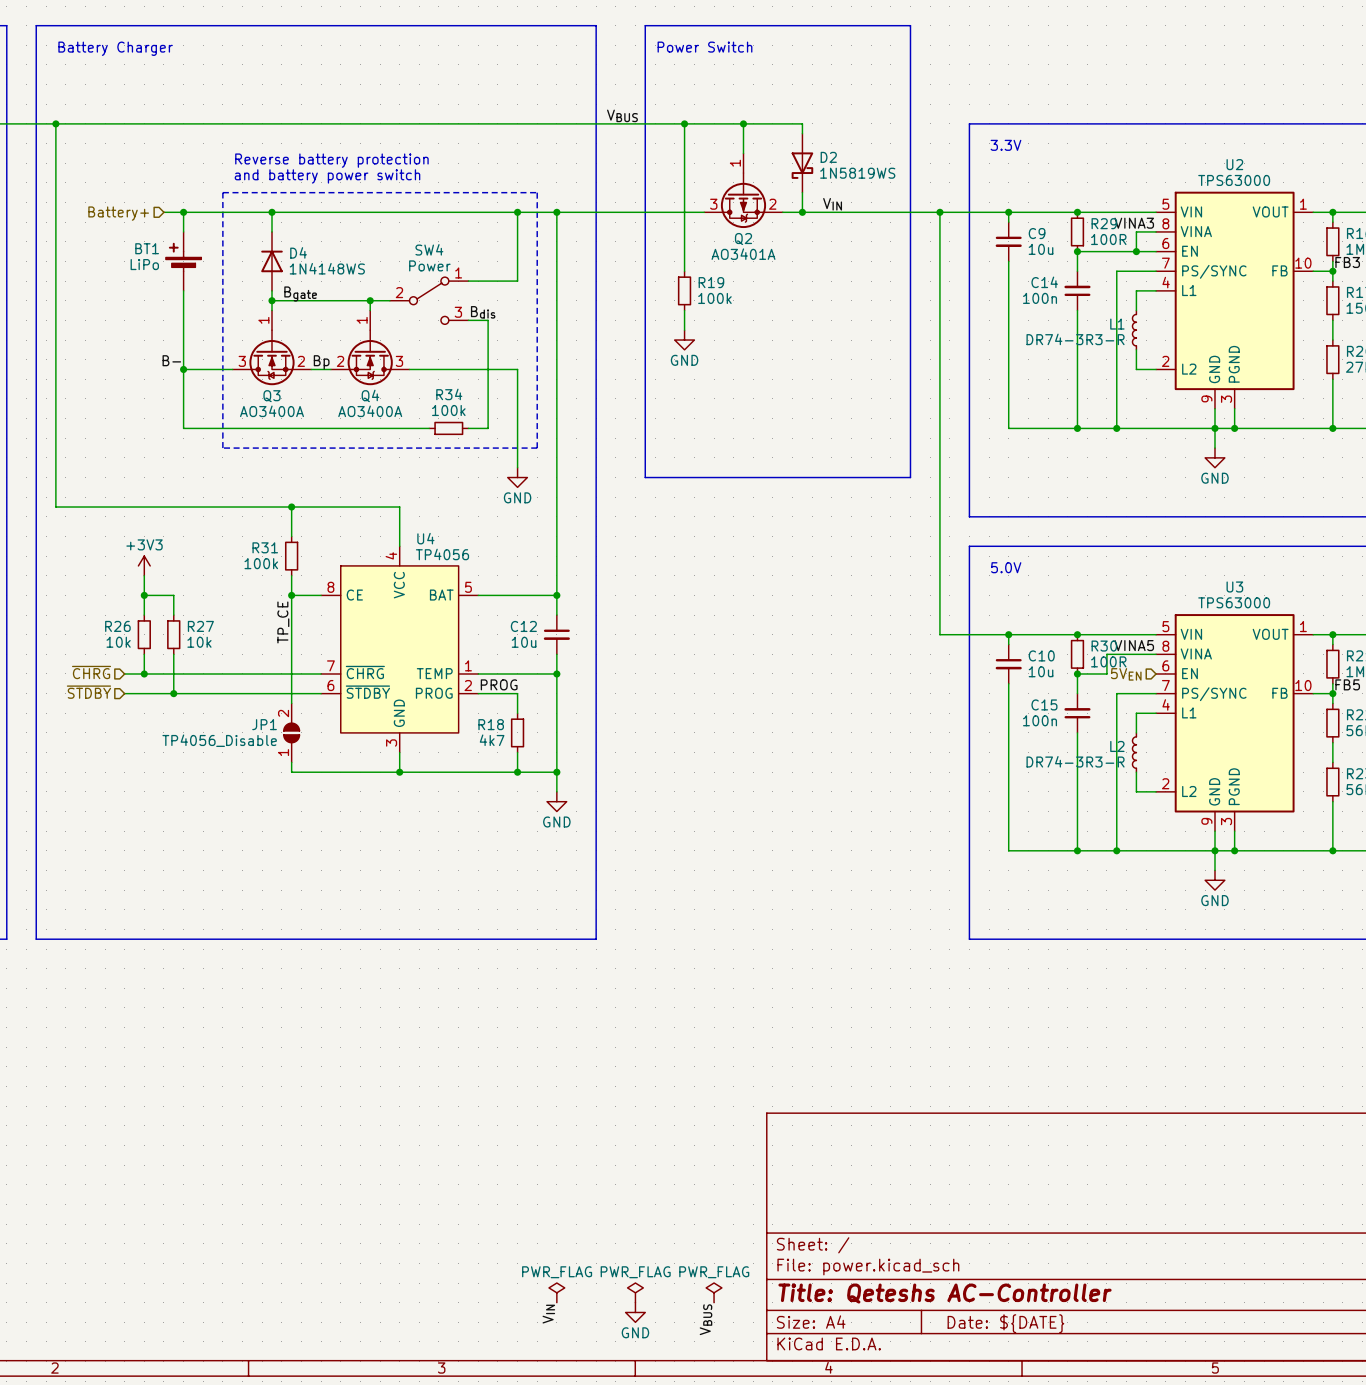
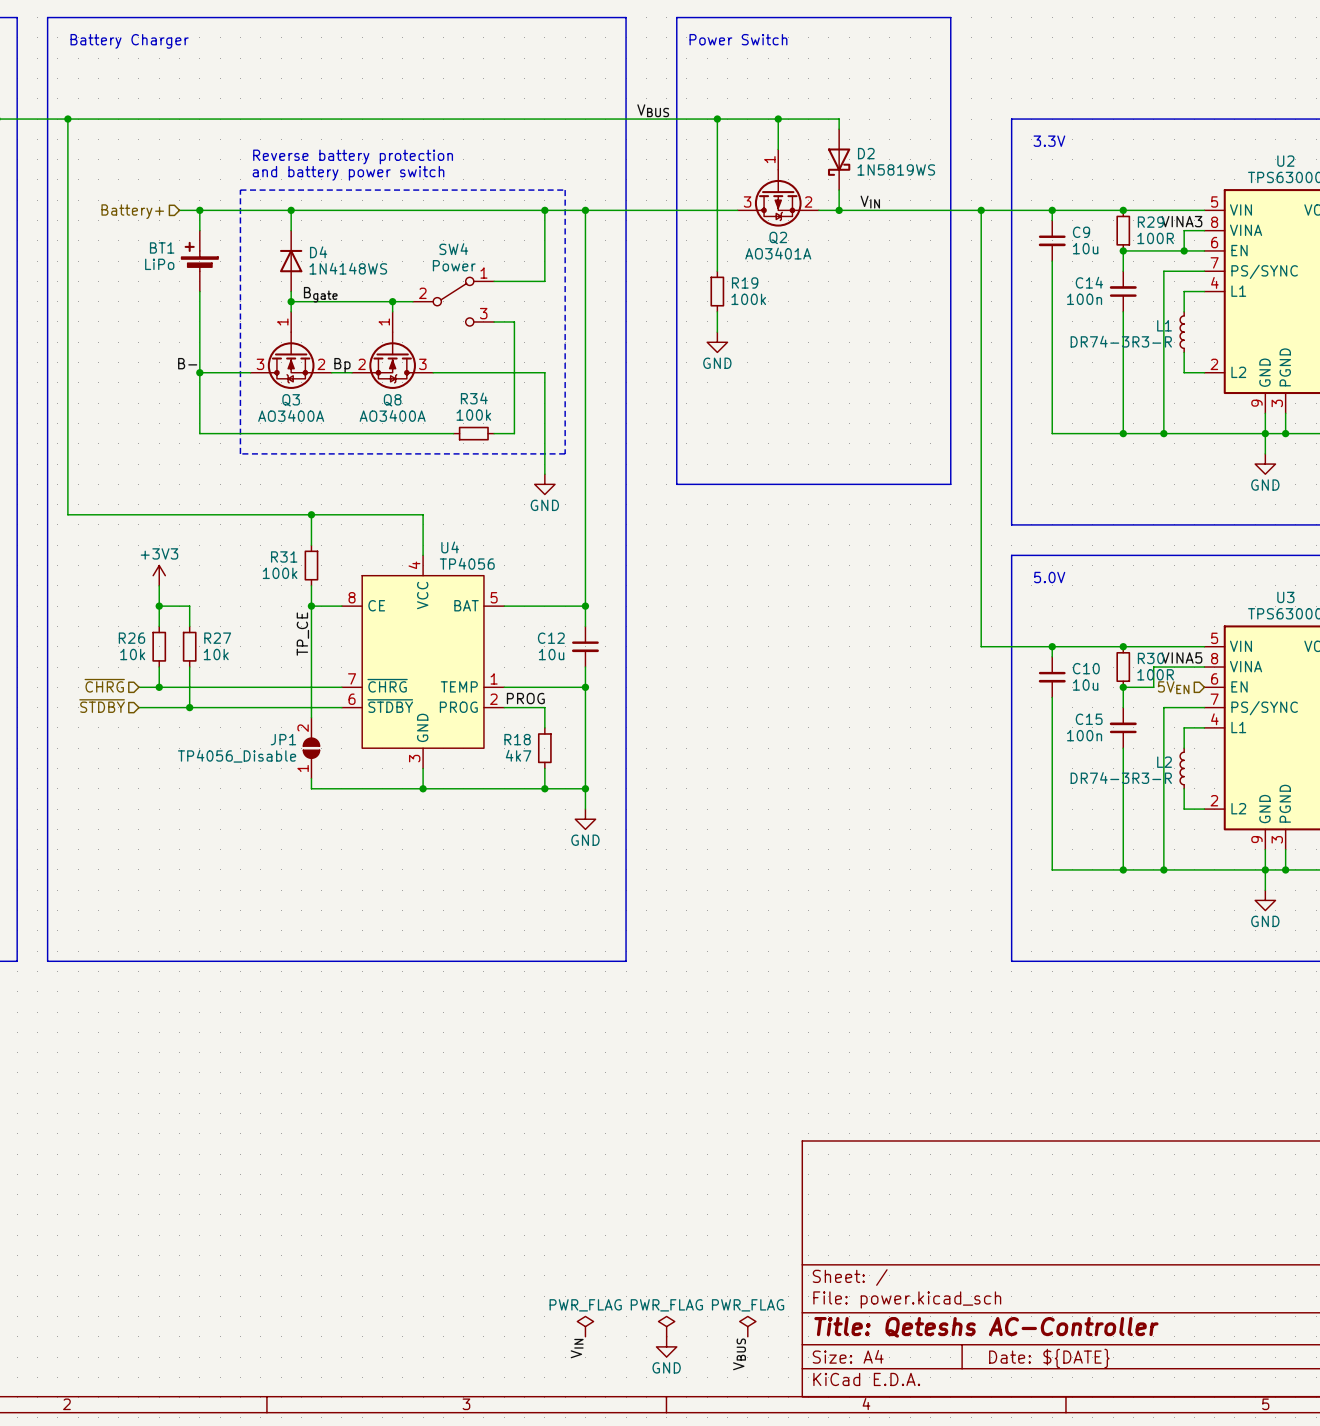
label: Bdis (483, 312) -> none
Q4 name: Q4 (370, 395) -> Q8 (392, 400)

